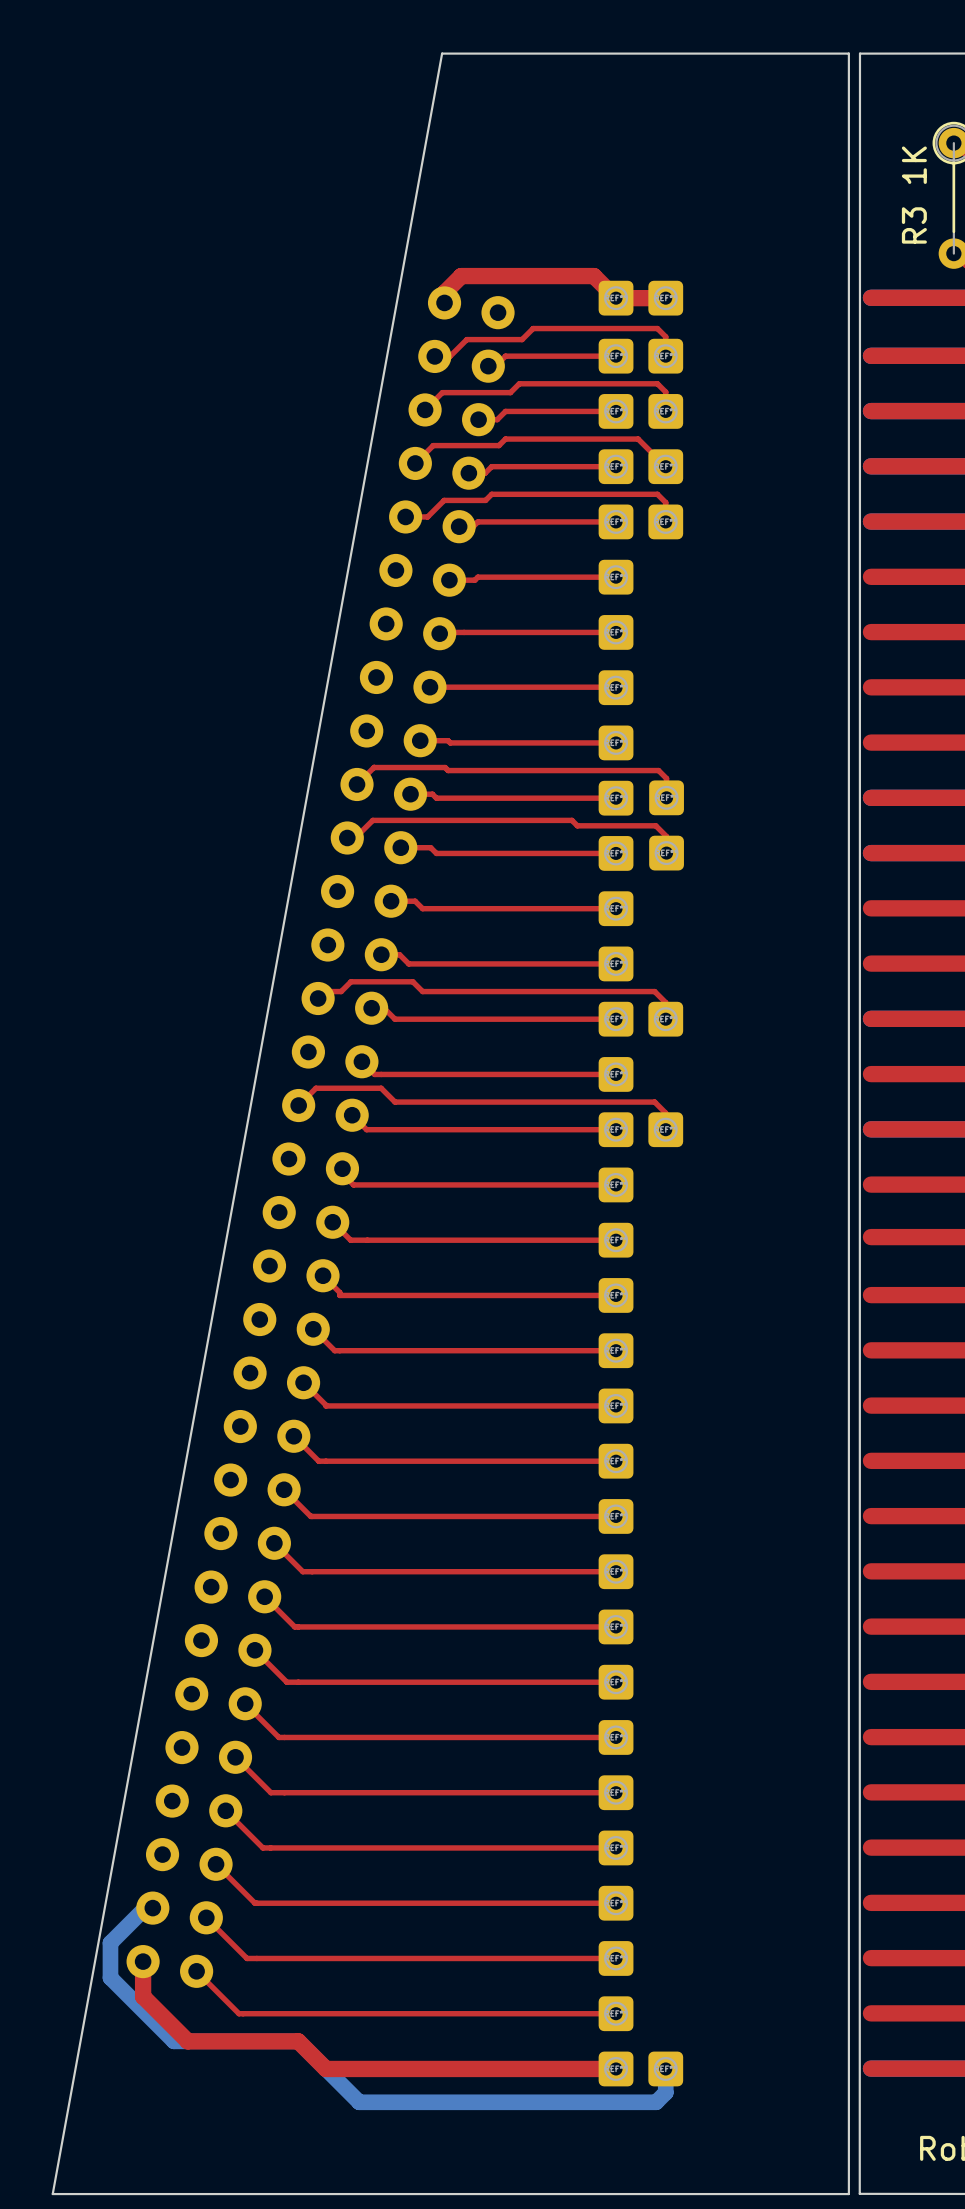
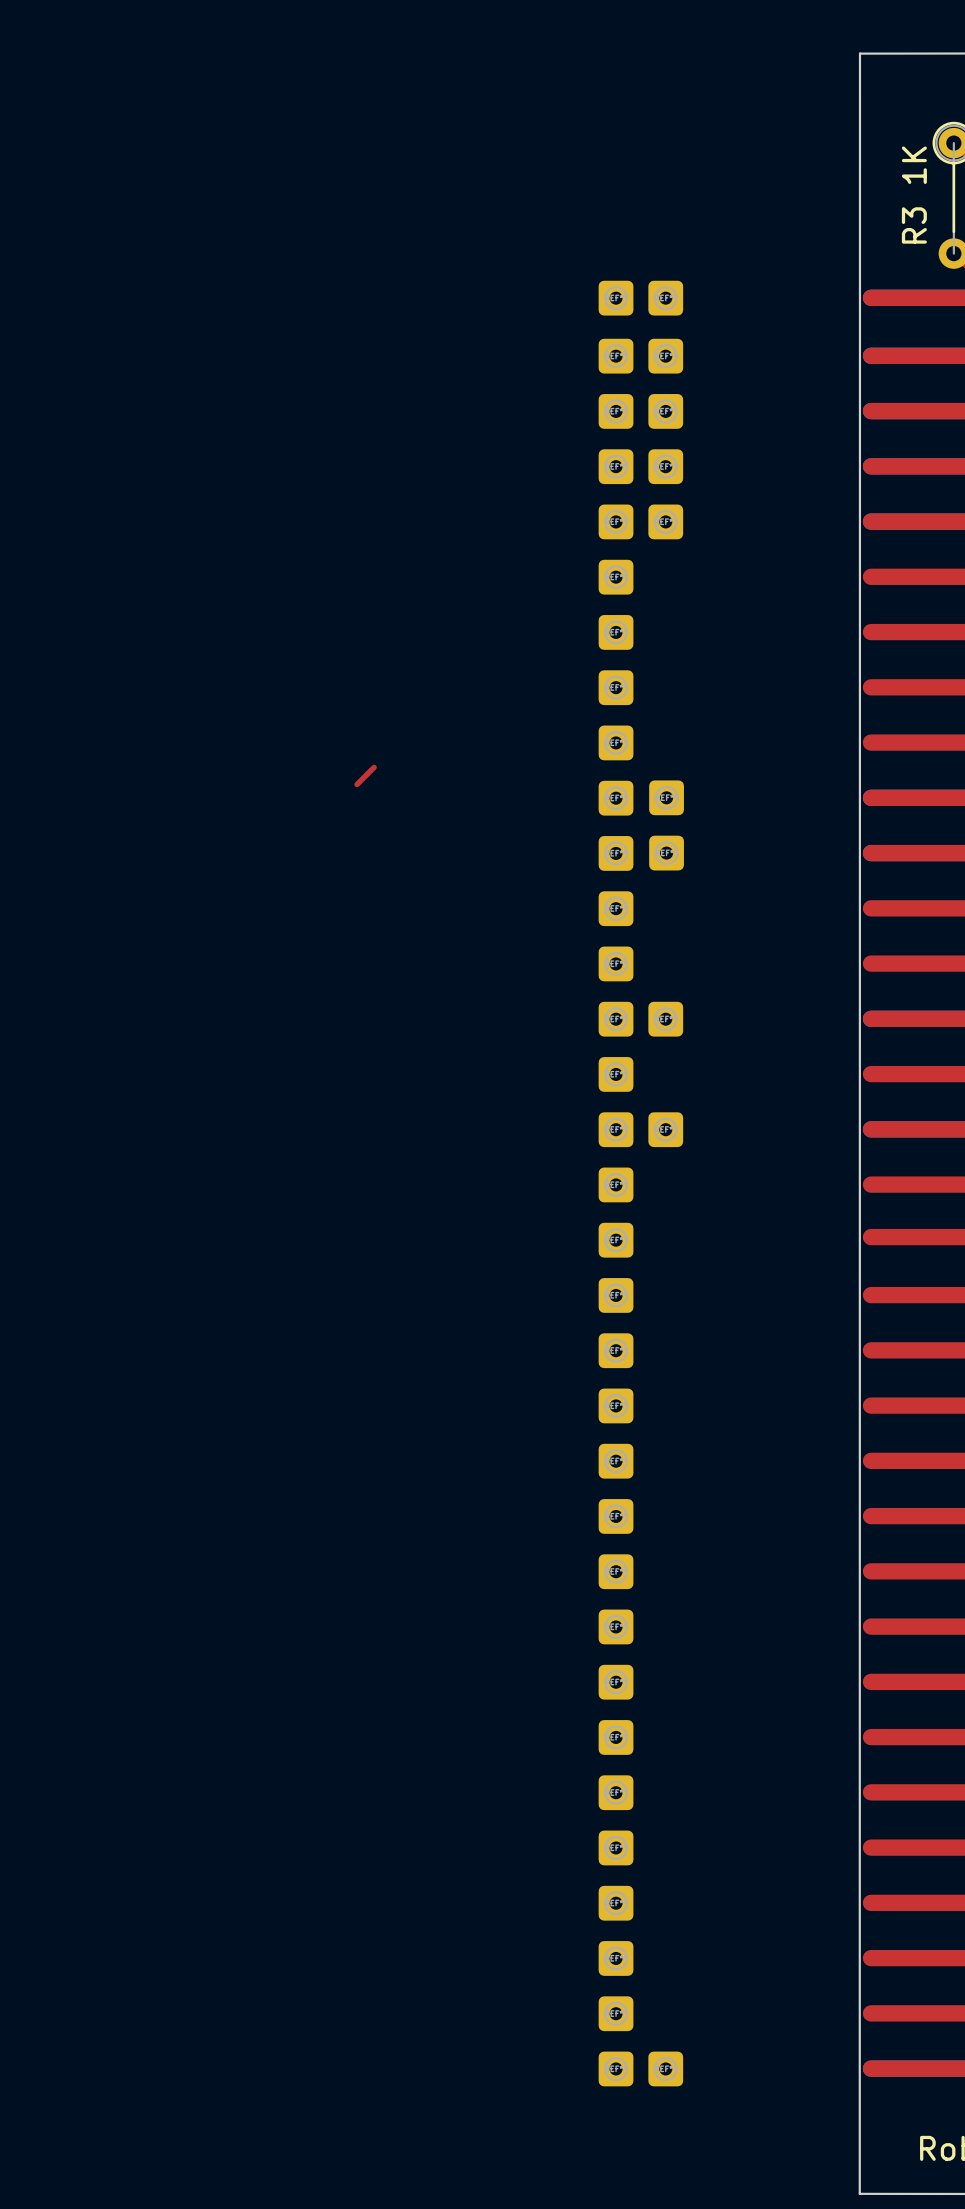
board edge: (442, 53) (848, 53) (848, 2194) (52, 2194) (442, 53) -> none
top track: (665, 298) (616, 298) (593, 276) (461, 276) (444, 292) (444, 302) -> none
top track: (616, 356) (505, 356) (495, 366) (488, 366) -> none
top track: (665, 356) (665, 336) (657, 328) (533, 328) (522, 339) (466, 339) (450, 356) (434, 356) -> none
top track: (425, 409) (442, 392) (510, 392) (519, 383) (657, 383) (665, 392) (665, 411) -> none
top track: (616, 411) (505, 411) (497, 419) (478, 419) -> none
top track: (415, 463) (433, 445) (498, 445) (505, 439) (638, 439) (665, 466) -> none
top track: (616, 466) (491, 466) (485, 473) (468, 473) -> none
top track: (405, 516) (427, 516) (444, 500) (485, 500) (491, 494) (657, 494) (665, 502) (665, 521) -> none
top track: (616, 521) (477, 521) (473, 526) (459, 526) -> none
top track: (616, 577) (477, 577) (474, 580) (449, 580) -> none
top track: (616, 632) (439, 633) -> none
top track: (429, 687) (616, 687) -> none
top track: (420, 740) (448, 740) (450, 742) (616, 742) -> none
top track: (374, 767) (445, 767) (448, 770) (658, 770) (666, 778) (666, 797) -> none
top track: (410, 794) (432, 794) (436, 798) (616, 798) -> none
top track: (347, 837) (355, 837) (372, 820) (571, 820) (577, 825) (655, 825) (666, 836) (666, 853) -> none
top track: (400, 847) (430, 847) (436, 853) (616, 853) -> none
top track: (391, 901) (415, 901) (422, 908) (616, 908) -> none
top track: (381, 954) (399, 954) (408, 963) (616, 963) -> none
top track: (318, 998) (325, 991) (341, 991) (350, 981) (412, 981) (422, 991) (654, 991) (665, 1002) (665, 1019) -> none
top track: (371, 1008) (384, 1008) (395, 1019) (616, 1019) -> none
top track: (361, 1061) (374, 1074) (616, 1074) -> none
top track: (298, 1105) (315, 1088) (381, 1088) (395, 1102) (654, 1102) (665, 1113) (665, 1129) -> none
top track: (352, 1115) (366, 1129) (616, 1129) -> none
part: (320, 1137) -> none
top track: (342, 1168) (342, 1173) (353, 1184) (616, 1184) -> none
top track: (332, 1222) (350, 1240) (616, 1240) -> none
top track: (323, 1275) (339, 1292) (339, 1295) (616, 1295) -> none
top track: (313, 1329) (334, 1350) (616, 1350) -> none
top track: (303, 1382) (325, 1405) (616, 1405) -> none
top track: (293, 1436) (318, 1461) (616, 1461) -> none
top track: (284, 1489) (310, 1516) (616, 1516) -> none
top track: (274, 1543) (302, 1571) (616, 1571) -> none
top track: (264, 1596) (294, 1626) (616, 1626) -> none
top track: (254, 1650) (286, 1682) (616, 1682) -> none
top track: (245, 1703) (278, 1737) (616, 1737) -> none
top track: (235, 1757) (270, 1792) (616, 1792) -> none
top track: (225, 1810) (262, 1847) (616, 1847) -> none
top track: (216, 1864) (254, 1903) (616, 1903) -> none
bottom track: (152, 1908) (145, 1908) (110, 1943) (110, 1977) (174, 2041) (298, 2041) (359, 2102) (656, 2102) (665, 2092) (665, 2068) -> none
top track: (206, 1917) (246, 1958) (616, 1958) -> none
top track: (143, 1961) (143, 1996) (187, 2041) (298, 2041) (325, 2068) (616, 2068) -> none
top track: (196, 1971) (239, 2013) (616, 2013) -> none

